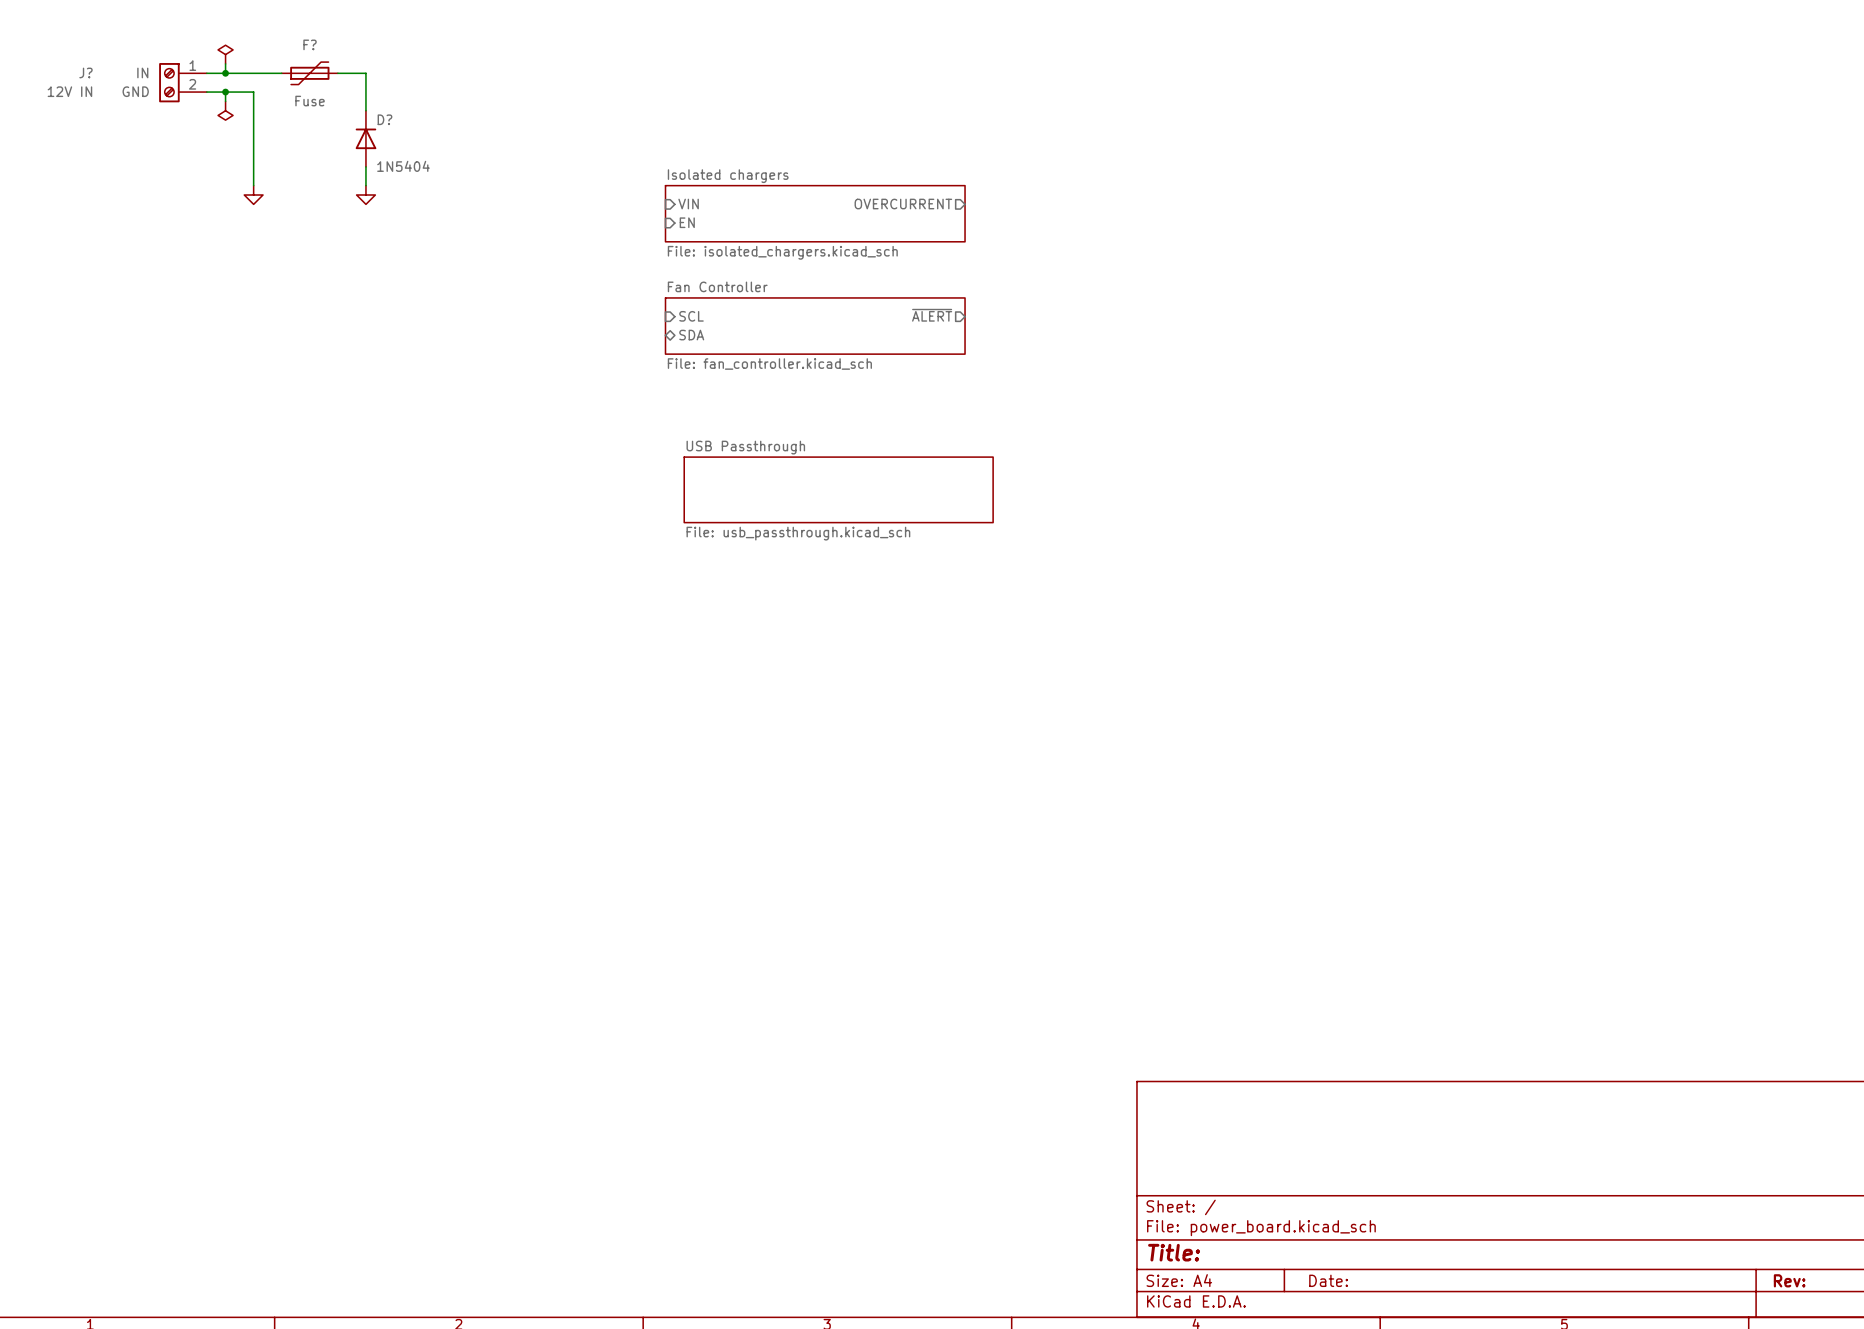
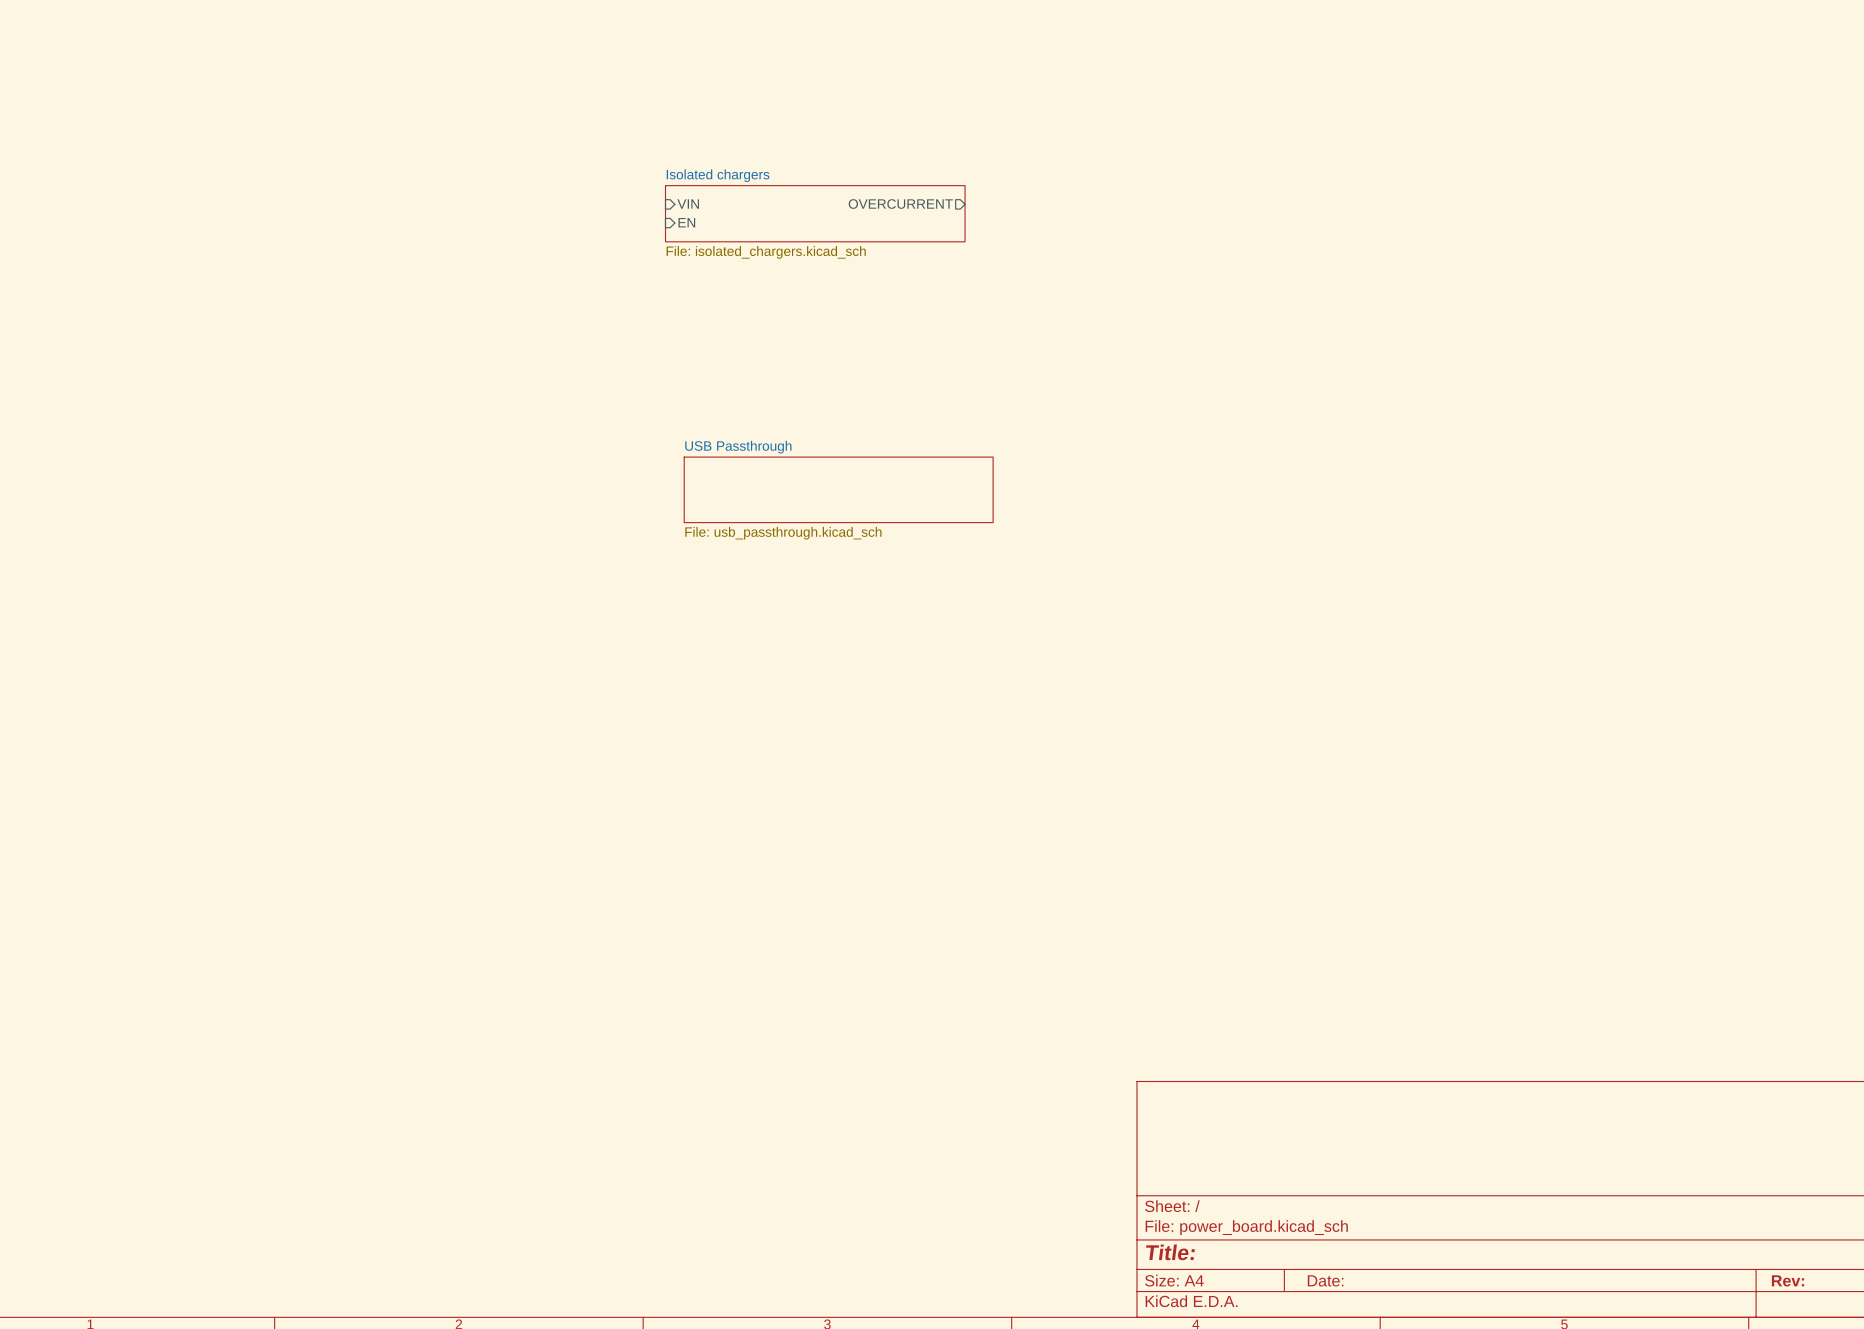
power symbol: (225, 54) -> none
wire: (225, 63) (225, 73) -> none
wire: (206, 73) (281, 73) -> none
junction: (225, 73) -> none
F?: Fuse (309, 73) -> none
wire: (337, 73) (365, 73) (365, 110) -> none
J?: (182, 82) -> none
wire: (206, 92) (253, 92) (253, 185) -> none
wire: (225, 92) (225, 101) -> none
junction: (225, 92) -> none
power symbol: (225, 110) -> none
D?: 1N5404 (365, 138) -> none
wire: (365, 166) (365, 185) -> none
power symbol: (253, 195) -> none
power symbol: (365, 195) -> none
sheet pin: ~{ALERT} (932, 315) -> none
sheet pin: SCL (691, 316) -> none
sheet Fan Controller: File: fan_controller.kicad_sch (815, 326) -> none
sheet pin: SDA (691, 335) -> none

